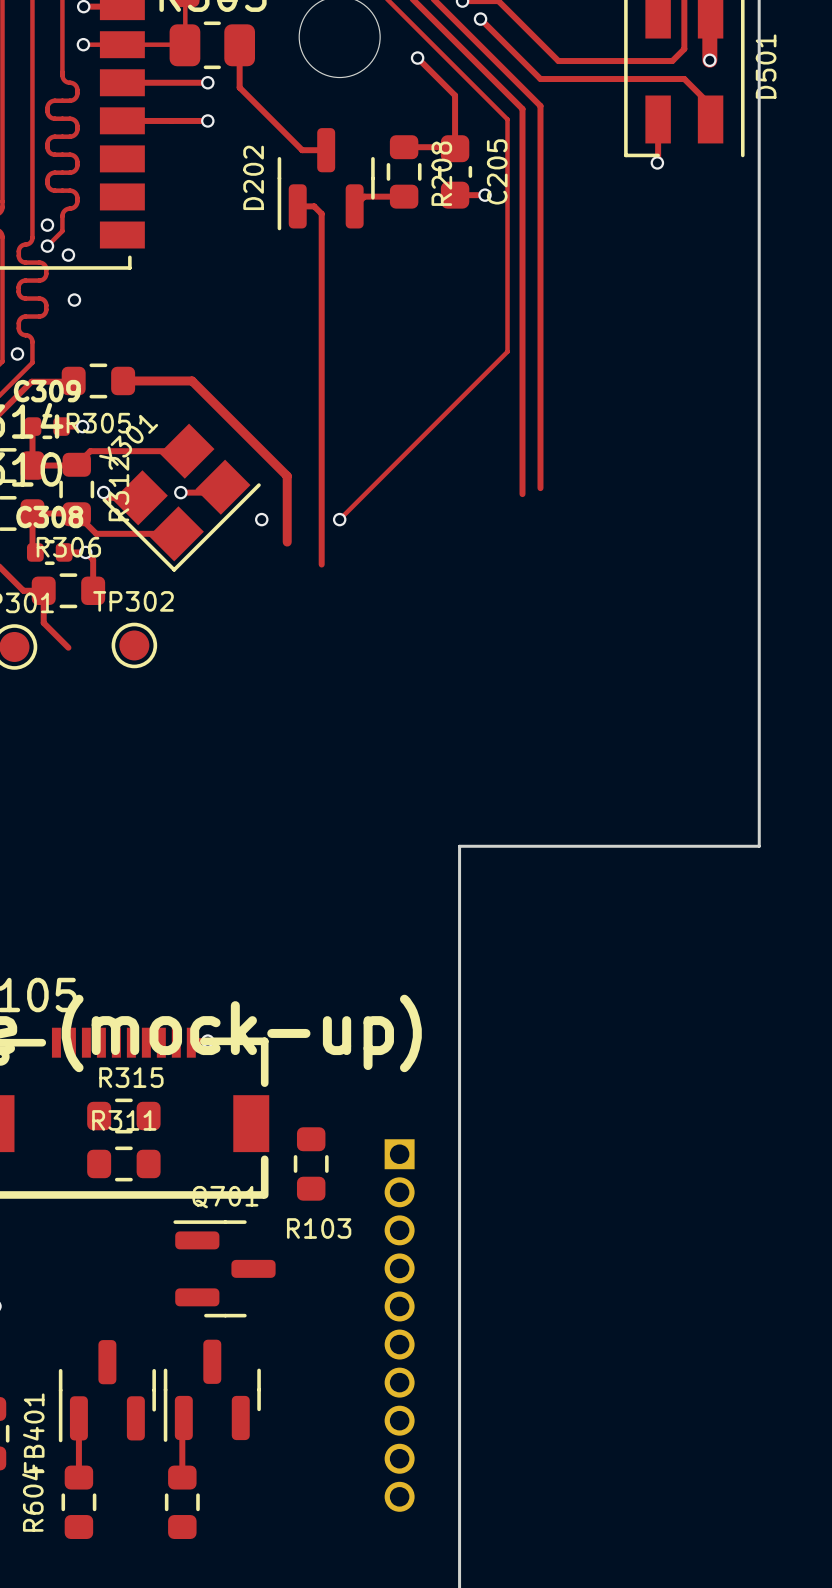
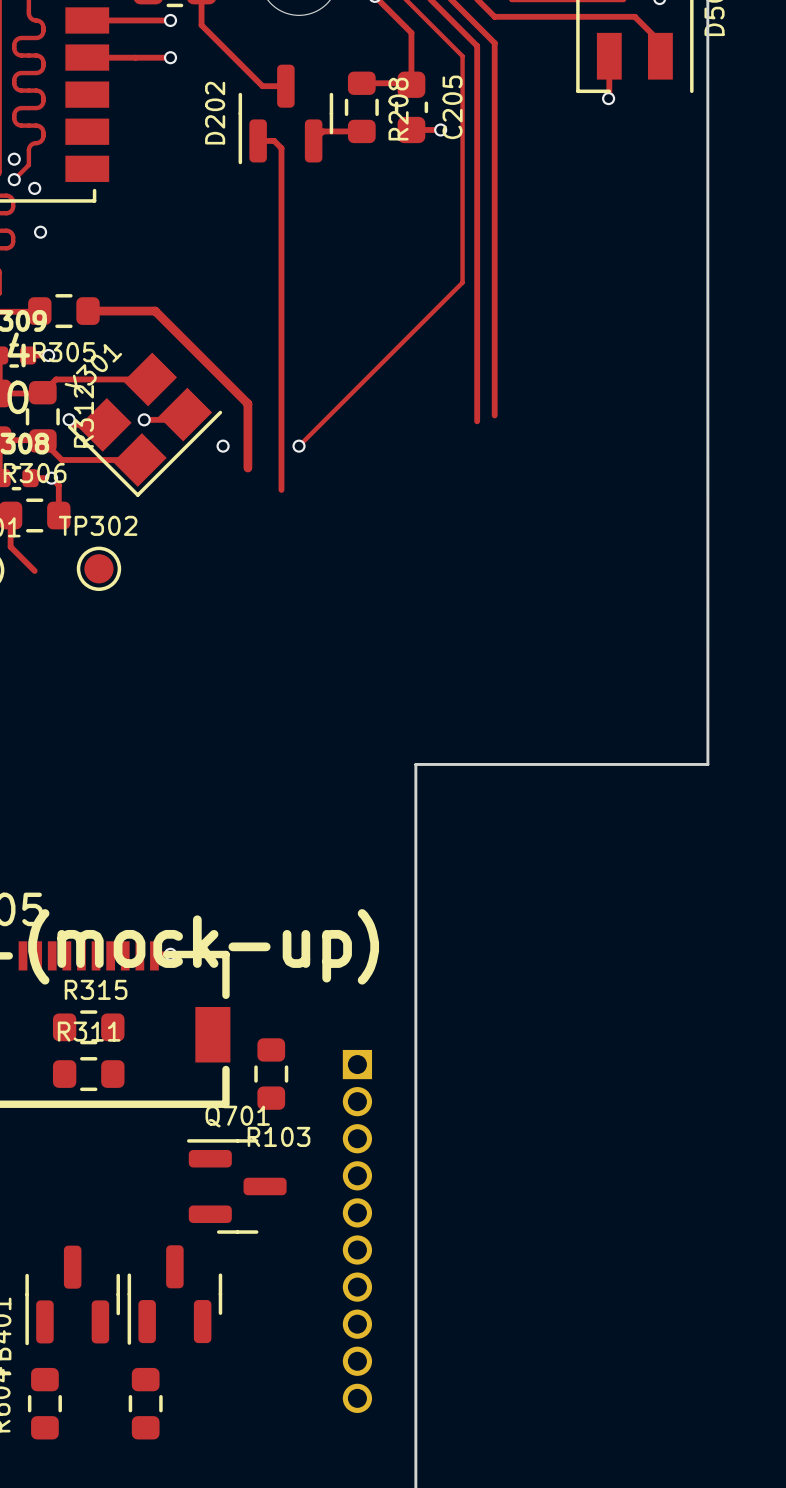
Q701 position: (224, 1268) -> (236, 1186)
track: (183, 1417) (182, 1477) -> none
track: (78, 1418) (78, 1477) -> none

